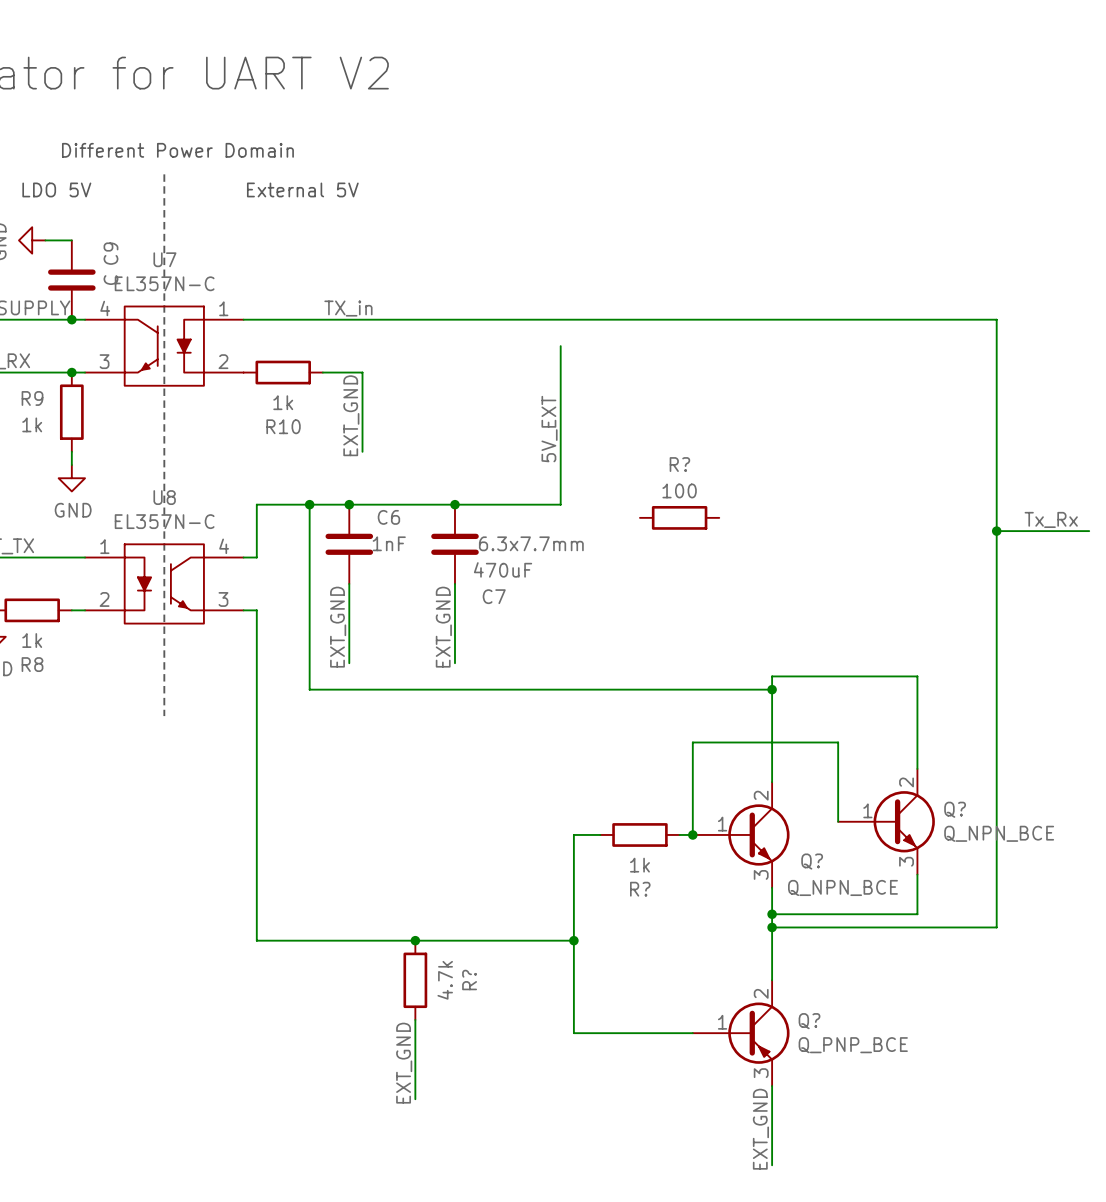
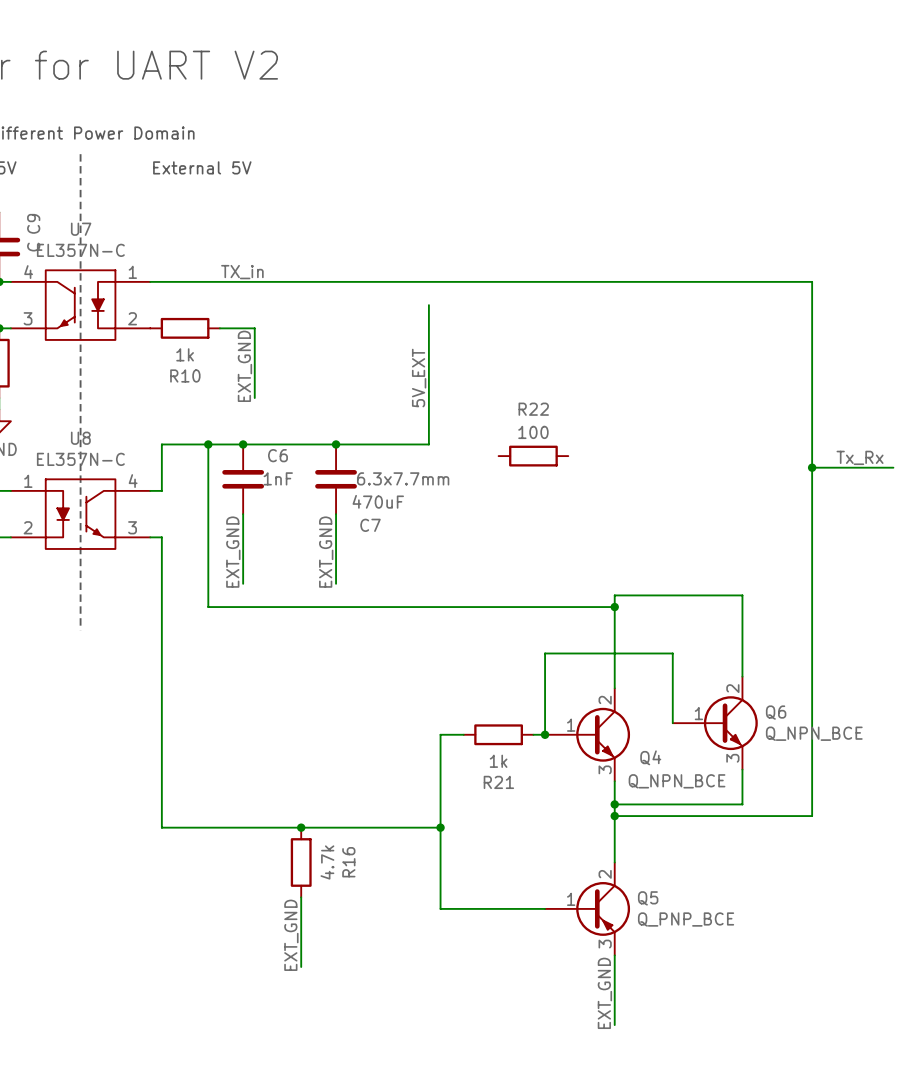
R? name: R? (679, 464) -> R22 (533, 409)
Q? name: Q? (955, 809) -> Q6 (776, 712)
Q? name: Q? (812, 861) -> Q4 (650, 757)
R? name: R? (640, 889) -> R21 (498, 782)
R? name: R? (469, 980) -> R16 (348, 862)
Q? name: Q? (809, 1021) -> Q5 (648, 898)

